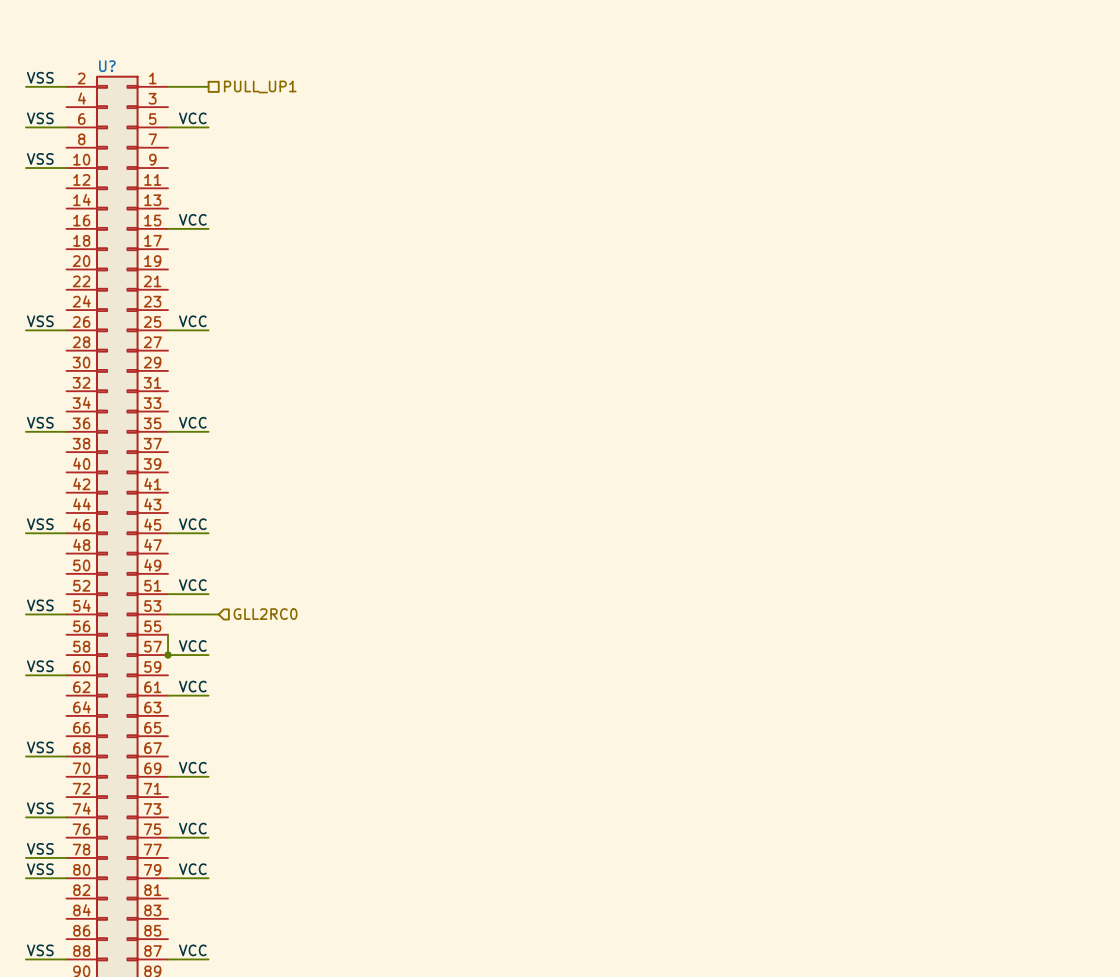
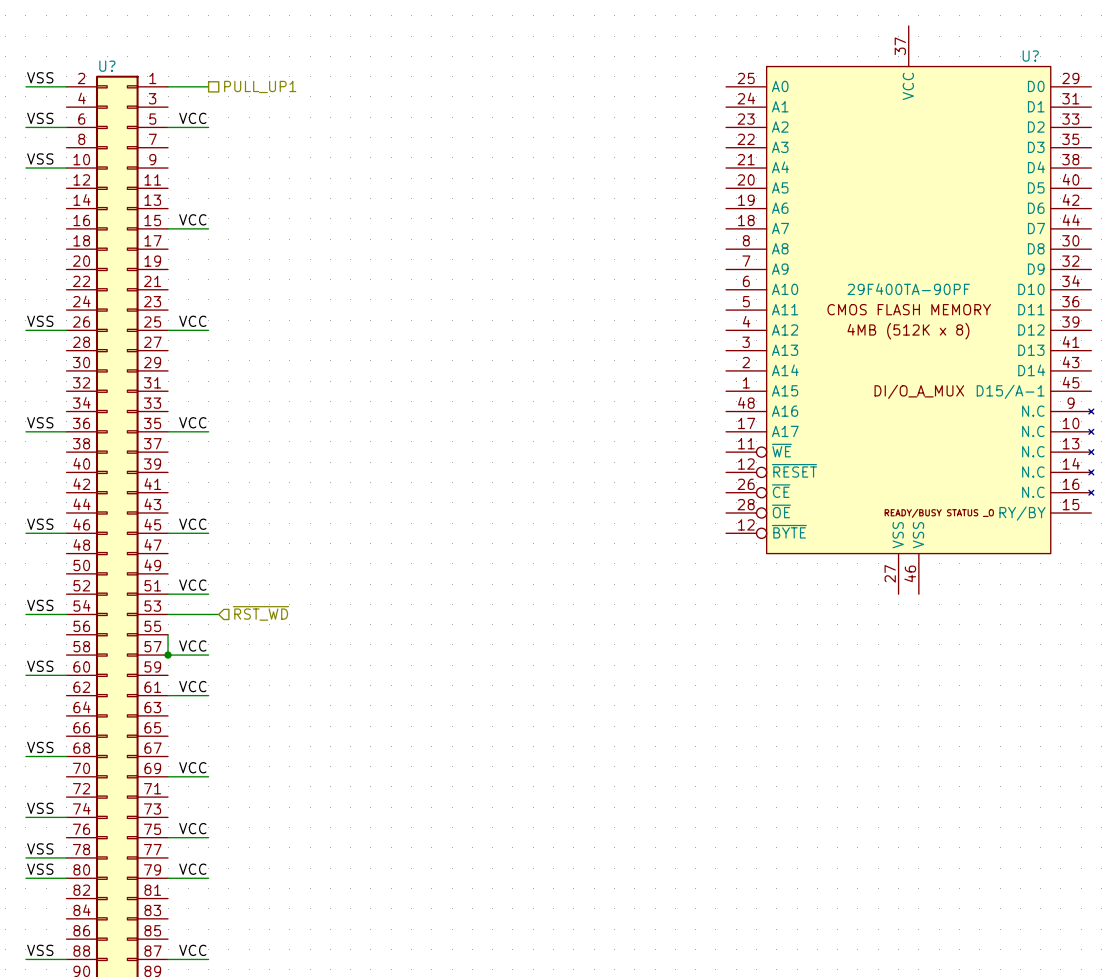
U?: none -> 29F400TA-90PF (909, 310)
hierarchical label: GLL2RC0 (265, 614) -> ~{RST_WD} (260, 613)

